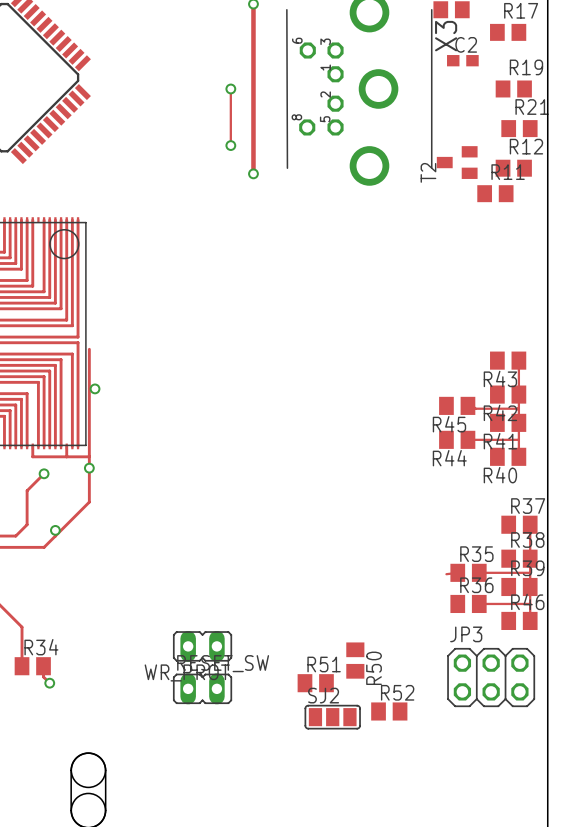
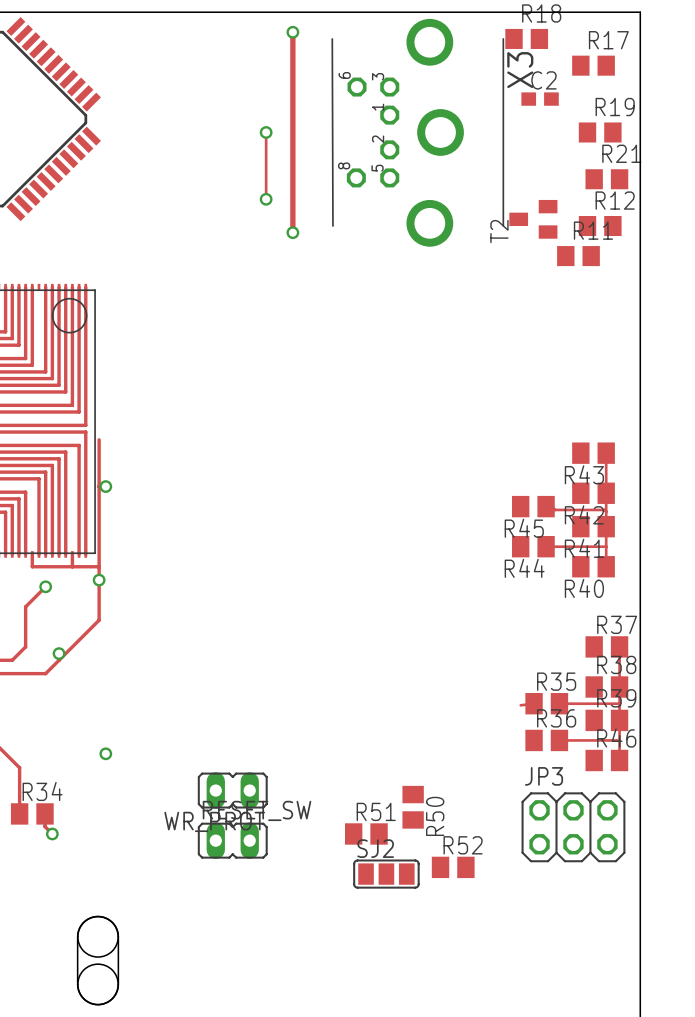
via: none -> (105, 753)

